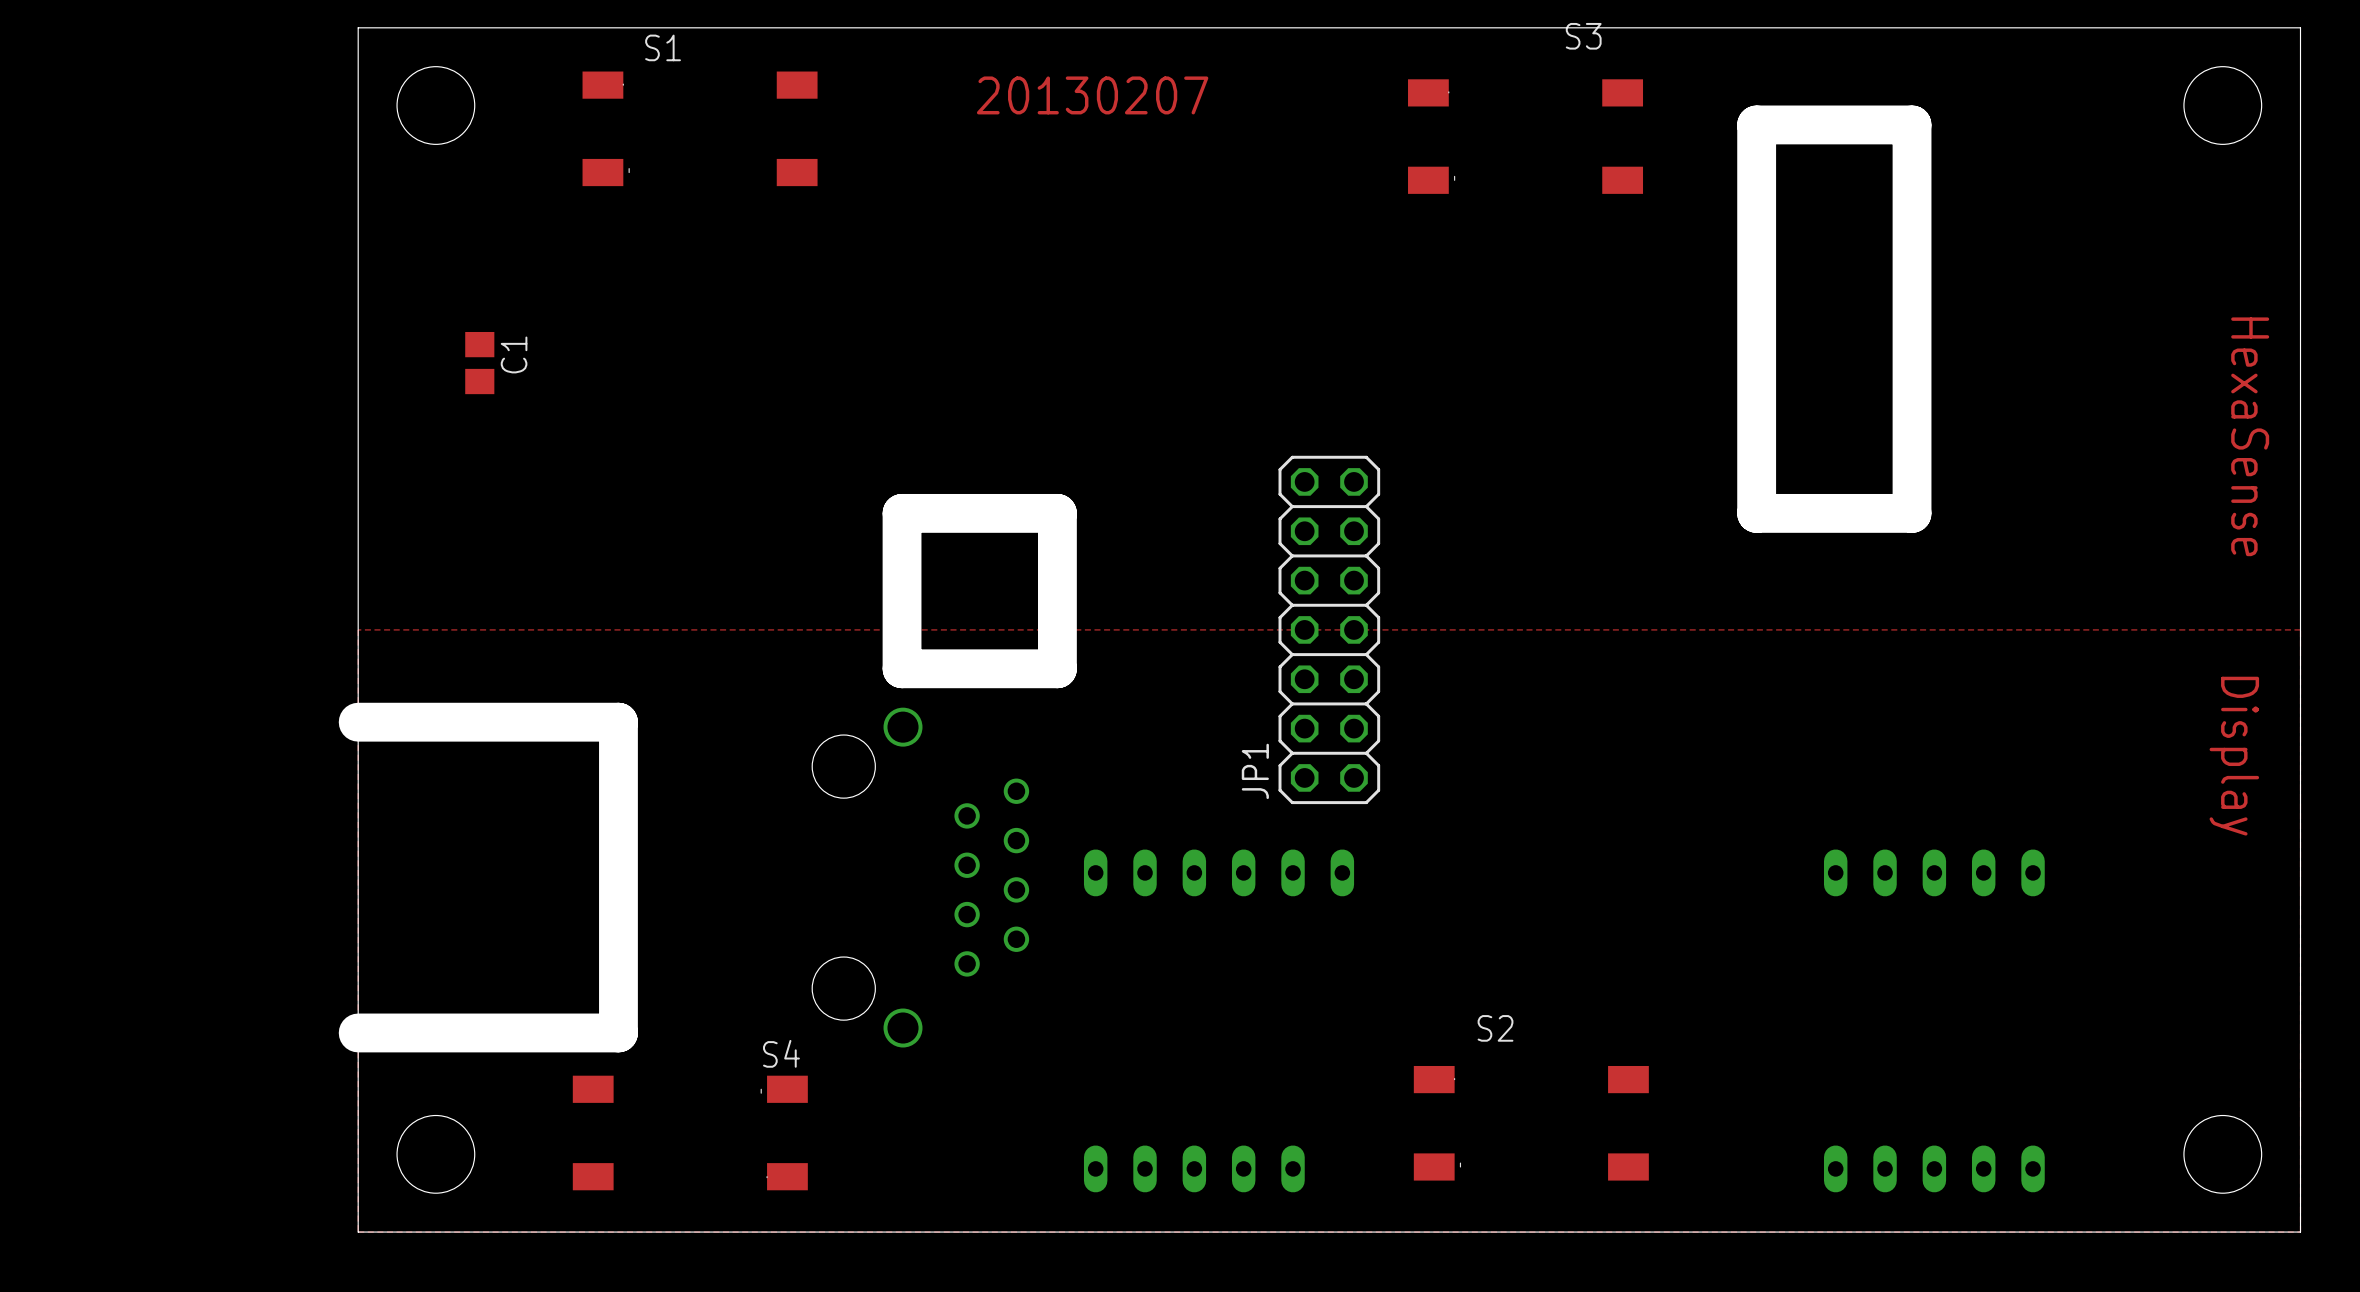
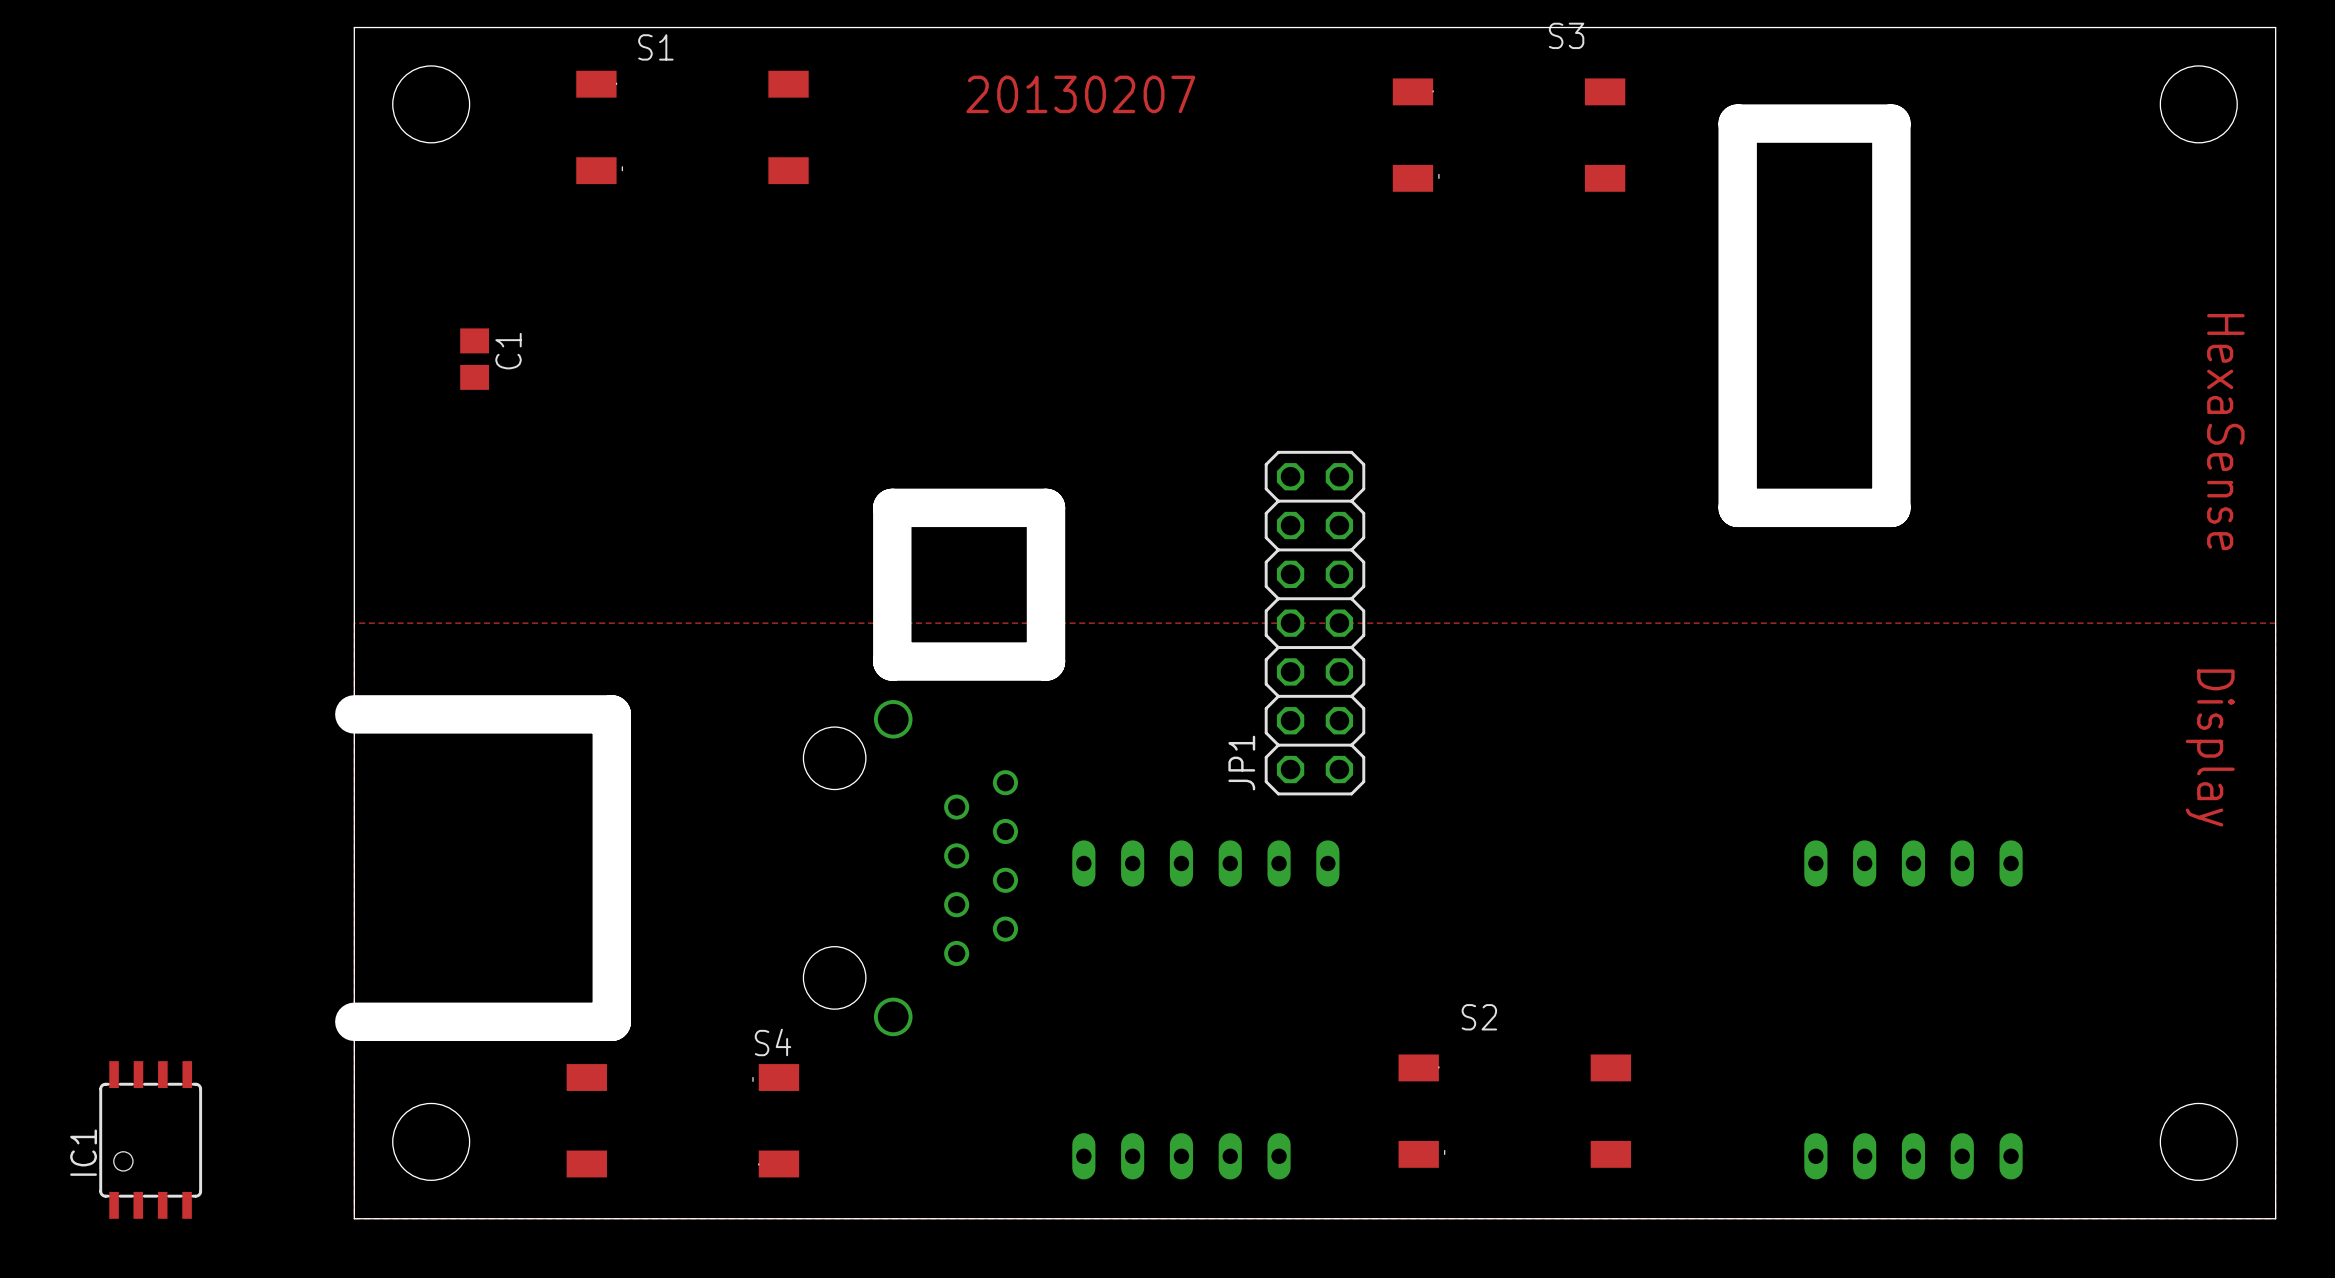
IC1: none -> (150, 1139)

